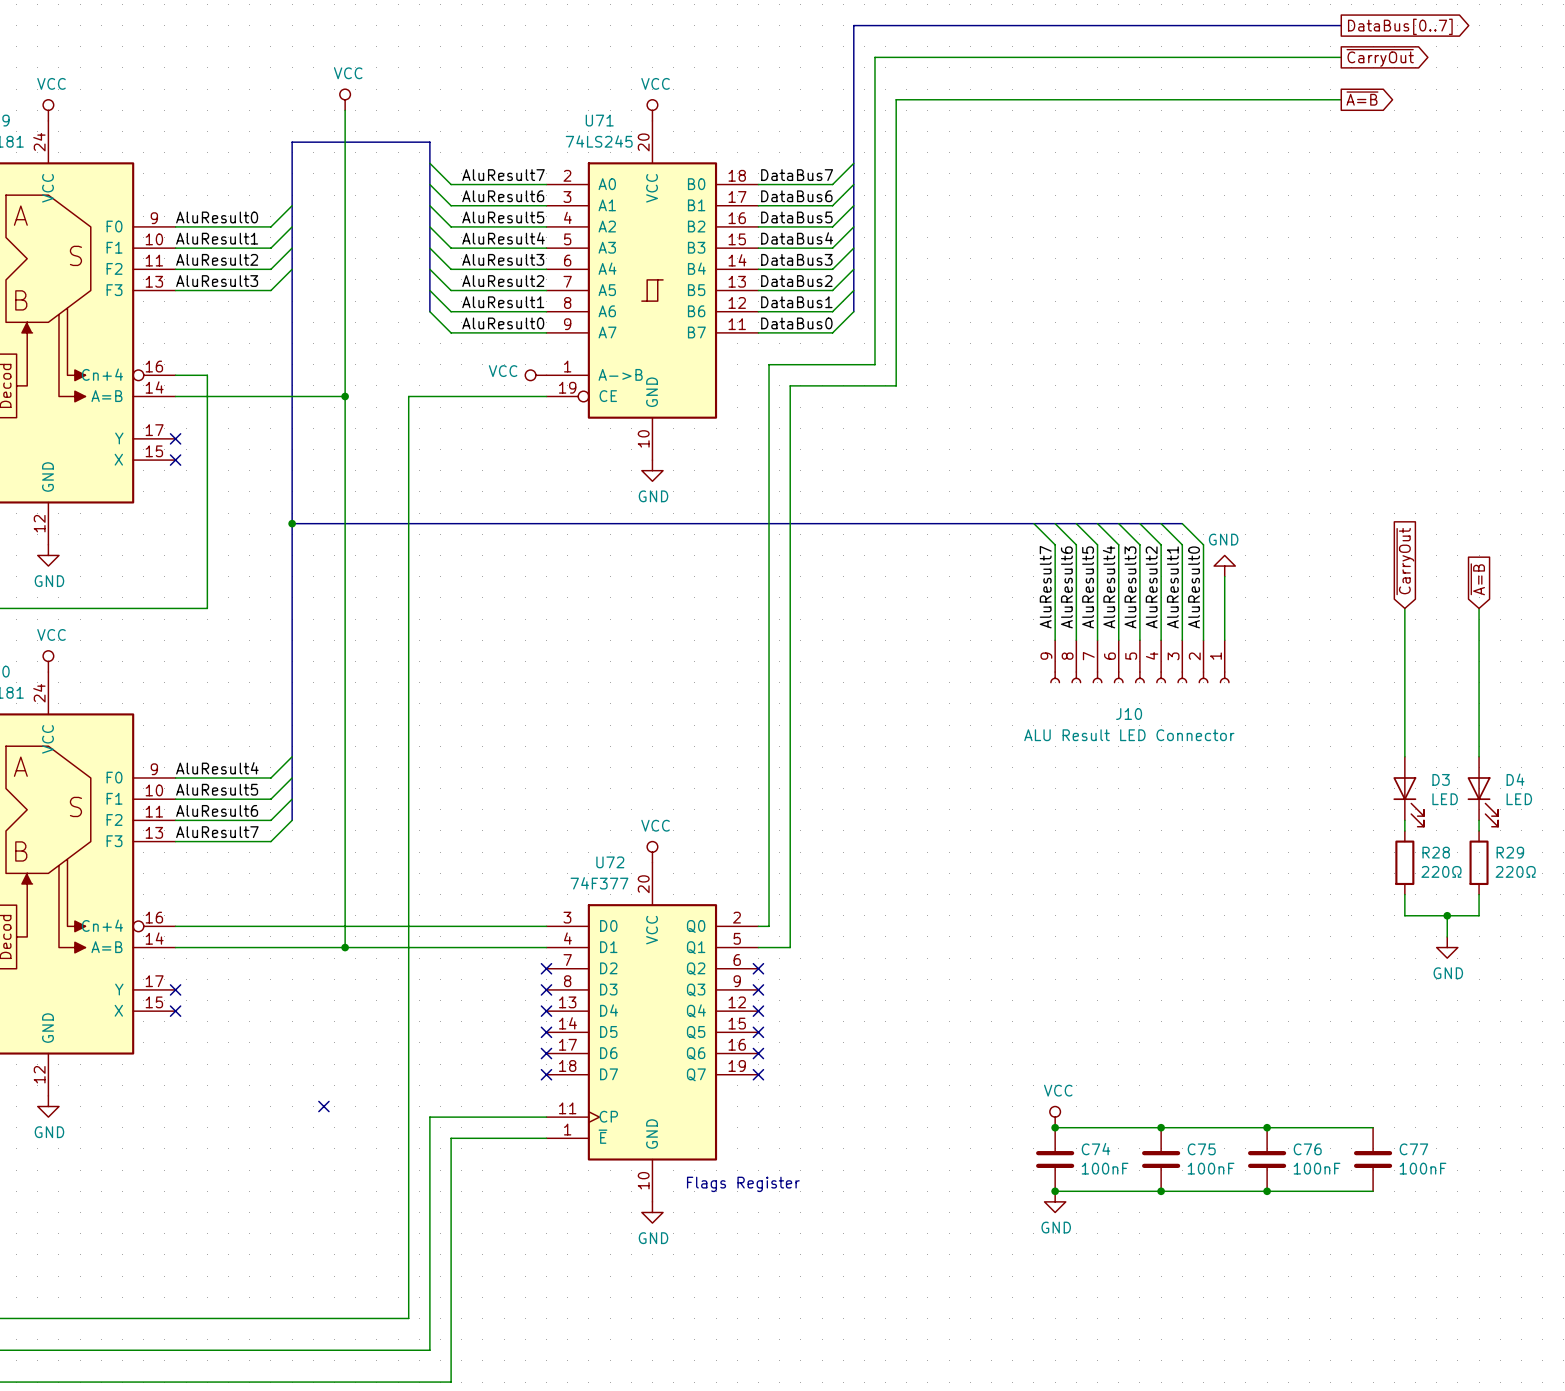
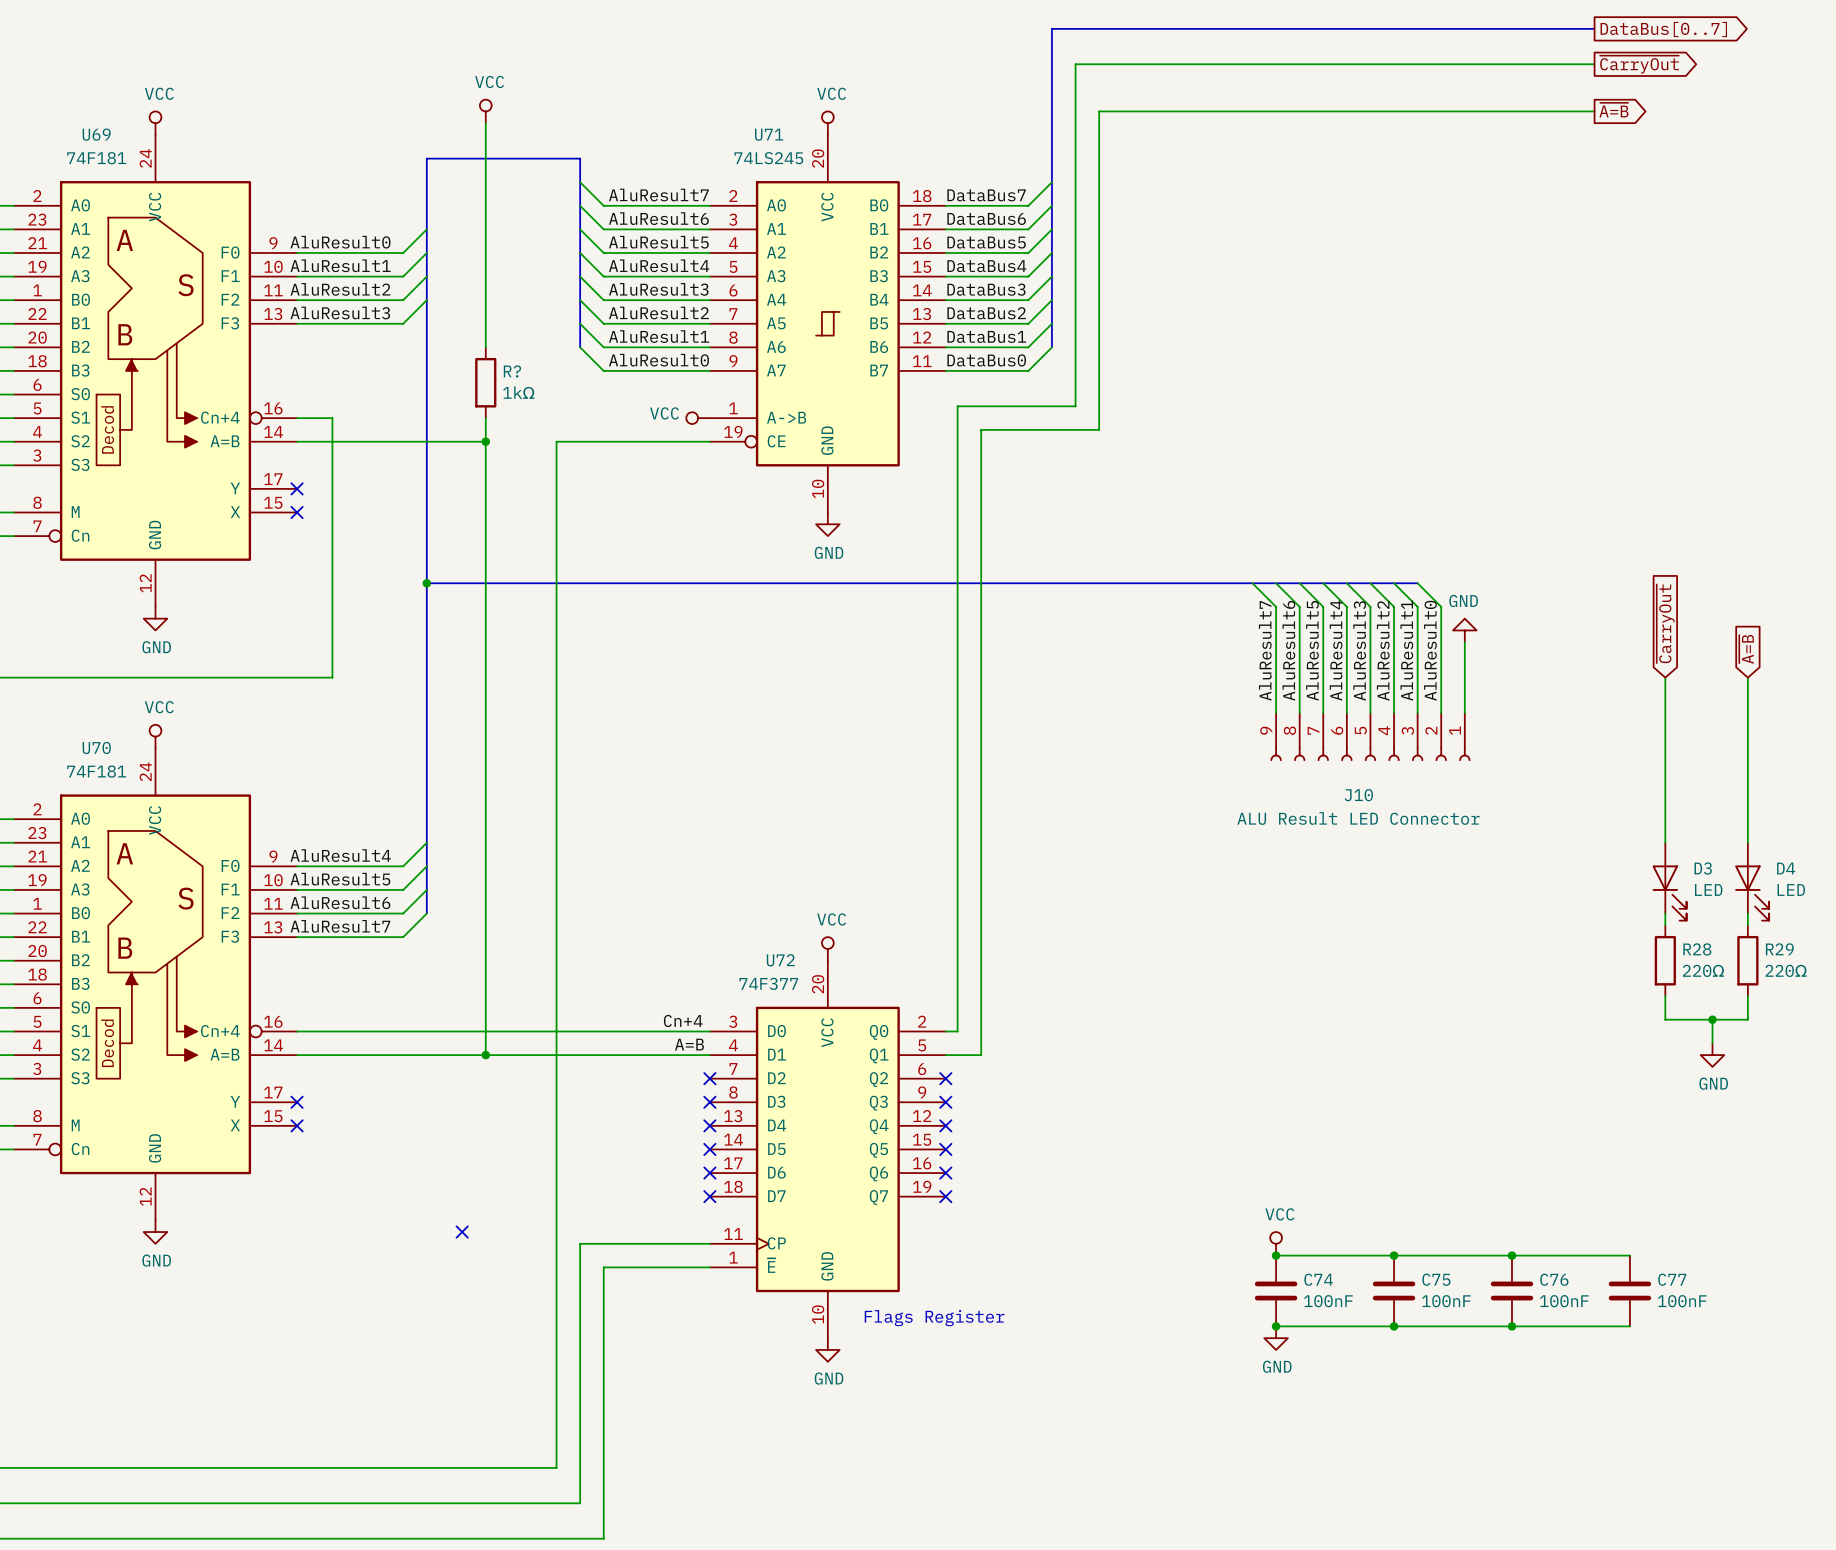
wire: (345, 311) (345, 375) -> none
R?: none -> 1kΩ (485, 382)
label: none -> Cn+4 (683, 1020)
label: none -> A=B (689, 1044)

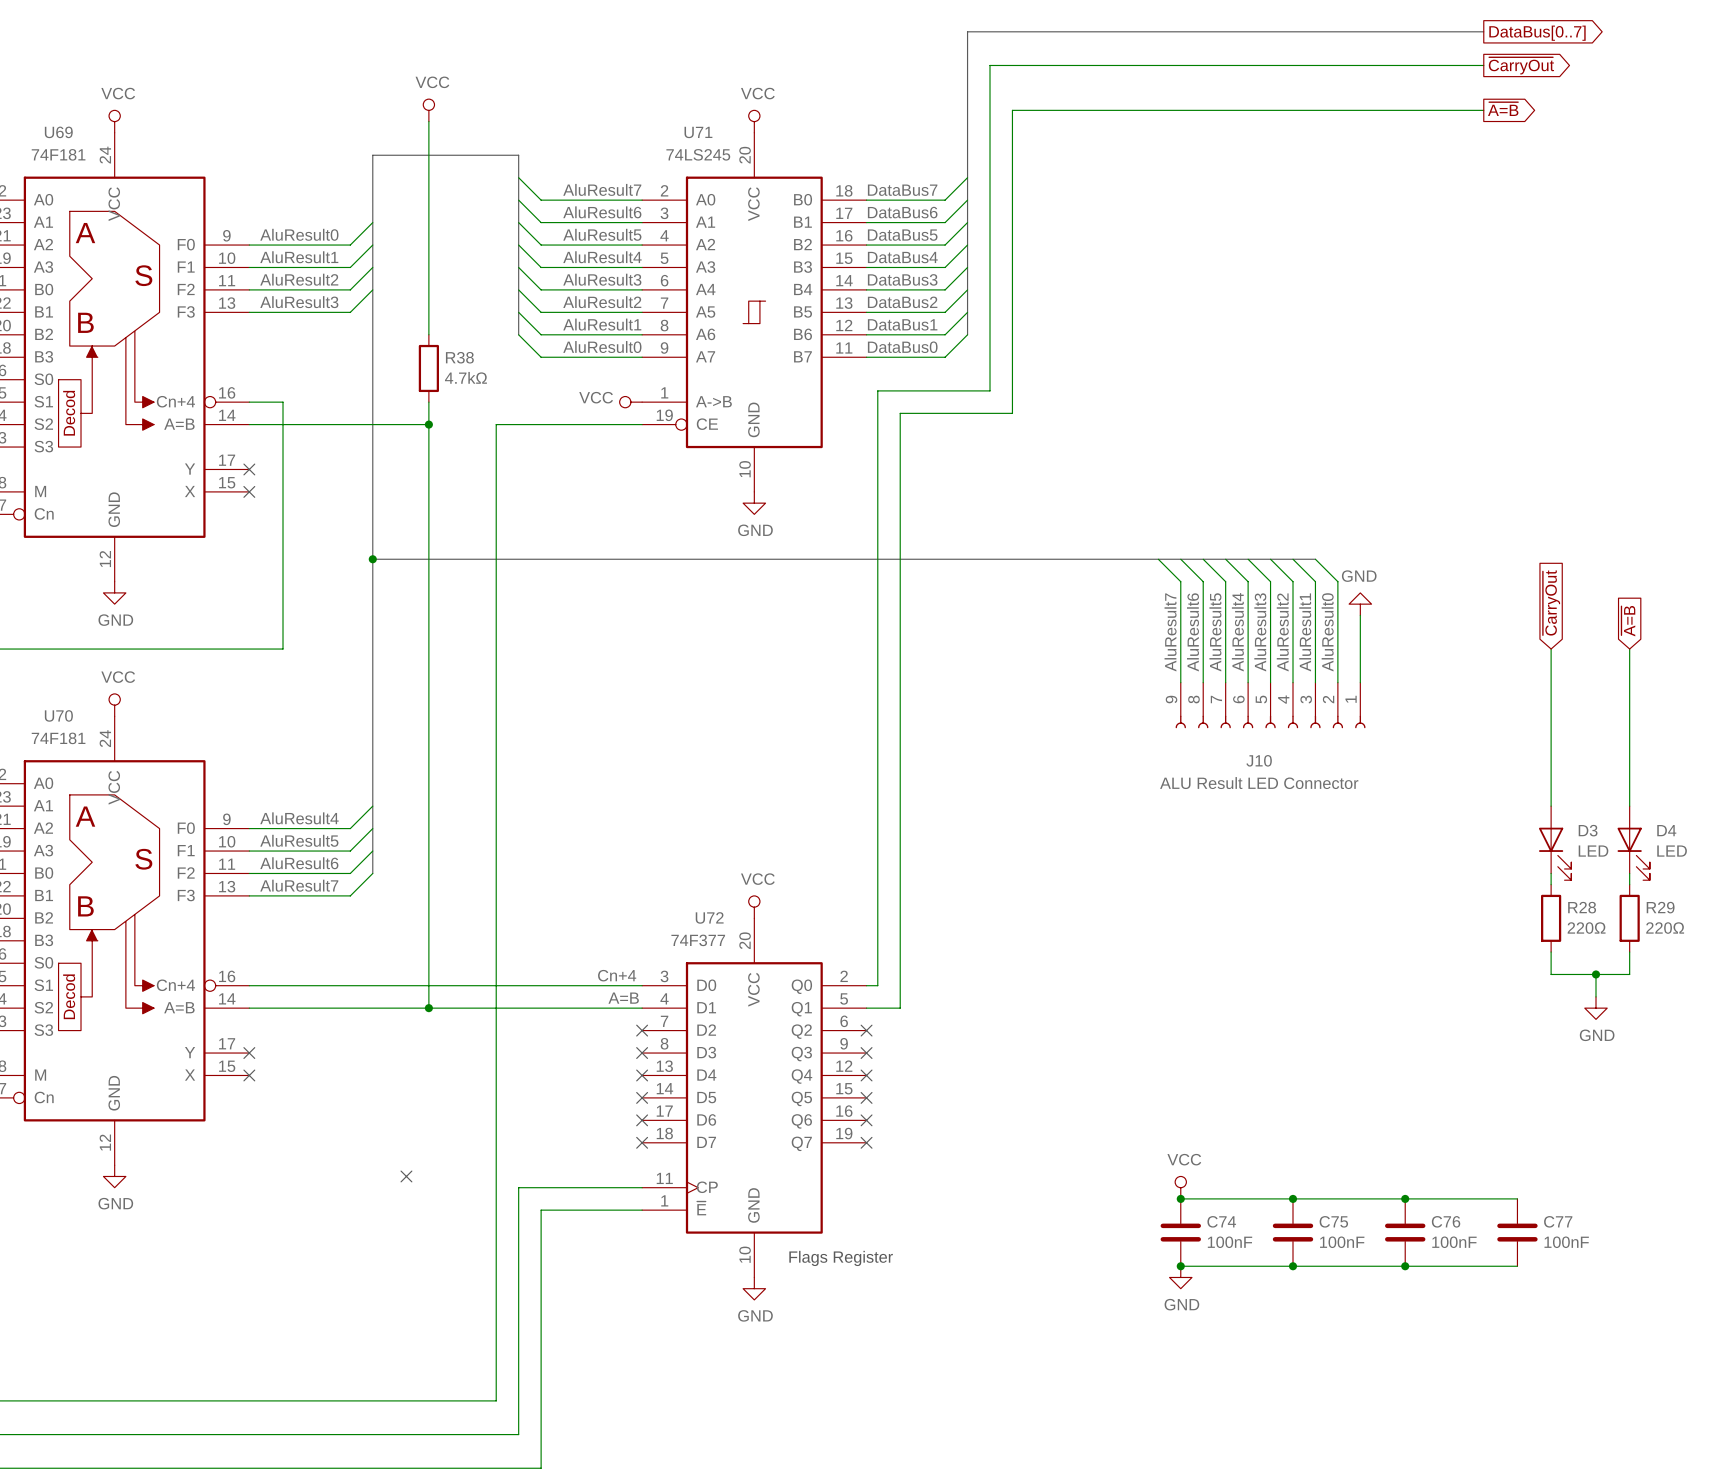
R? name: R? (512, 371) -> R38 (459, 357)
R? value: 1kΩ (518, 392) -> 4.7kΩ (465, 377)

